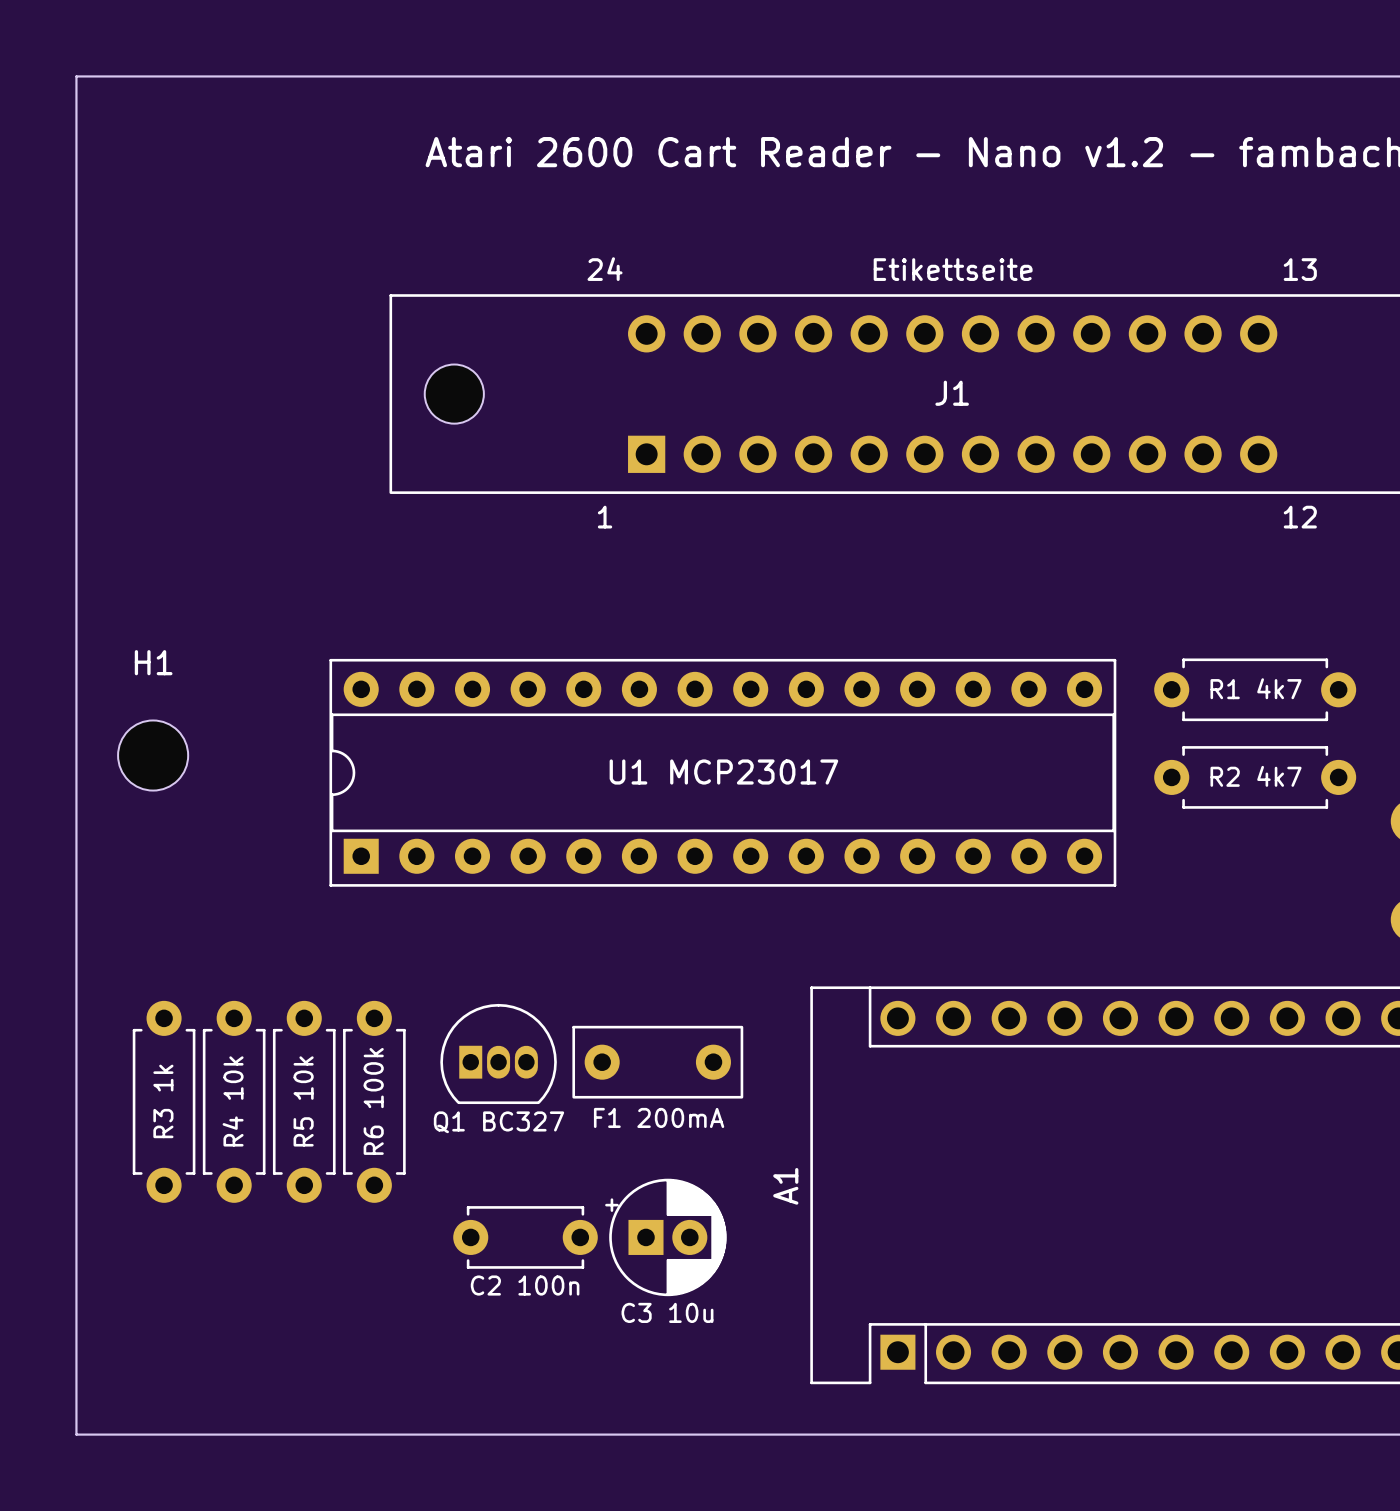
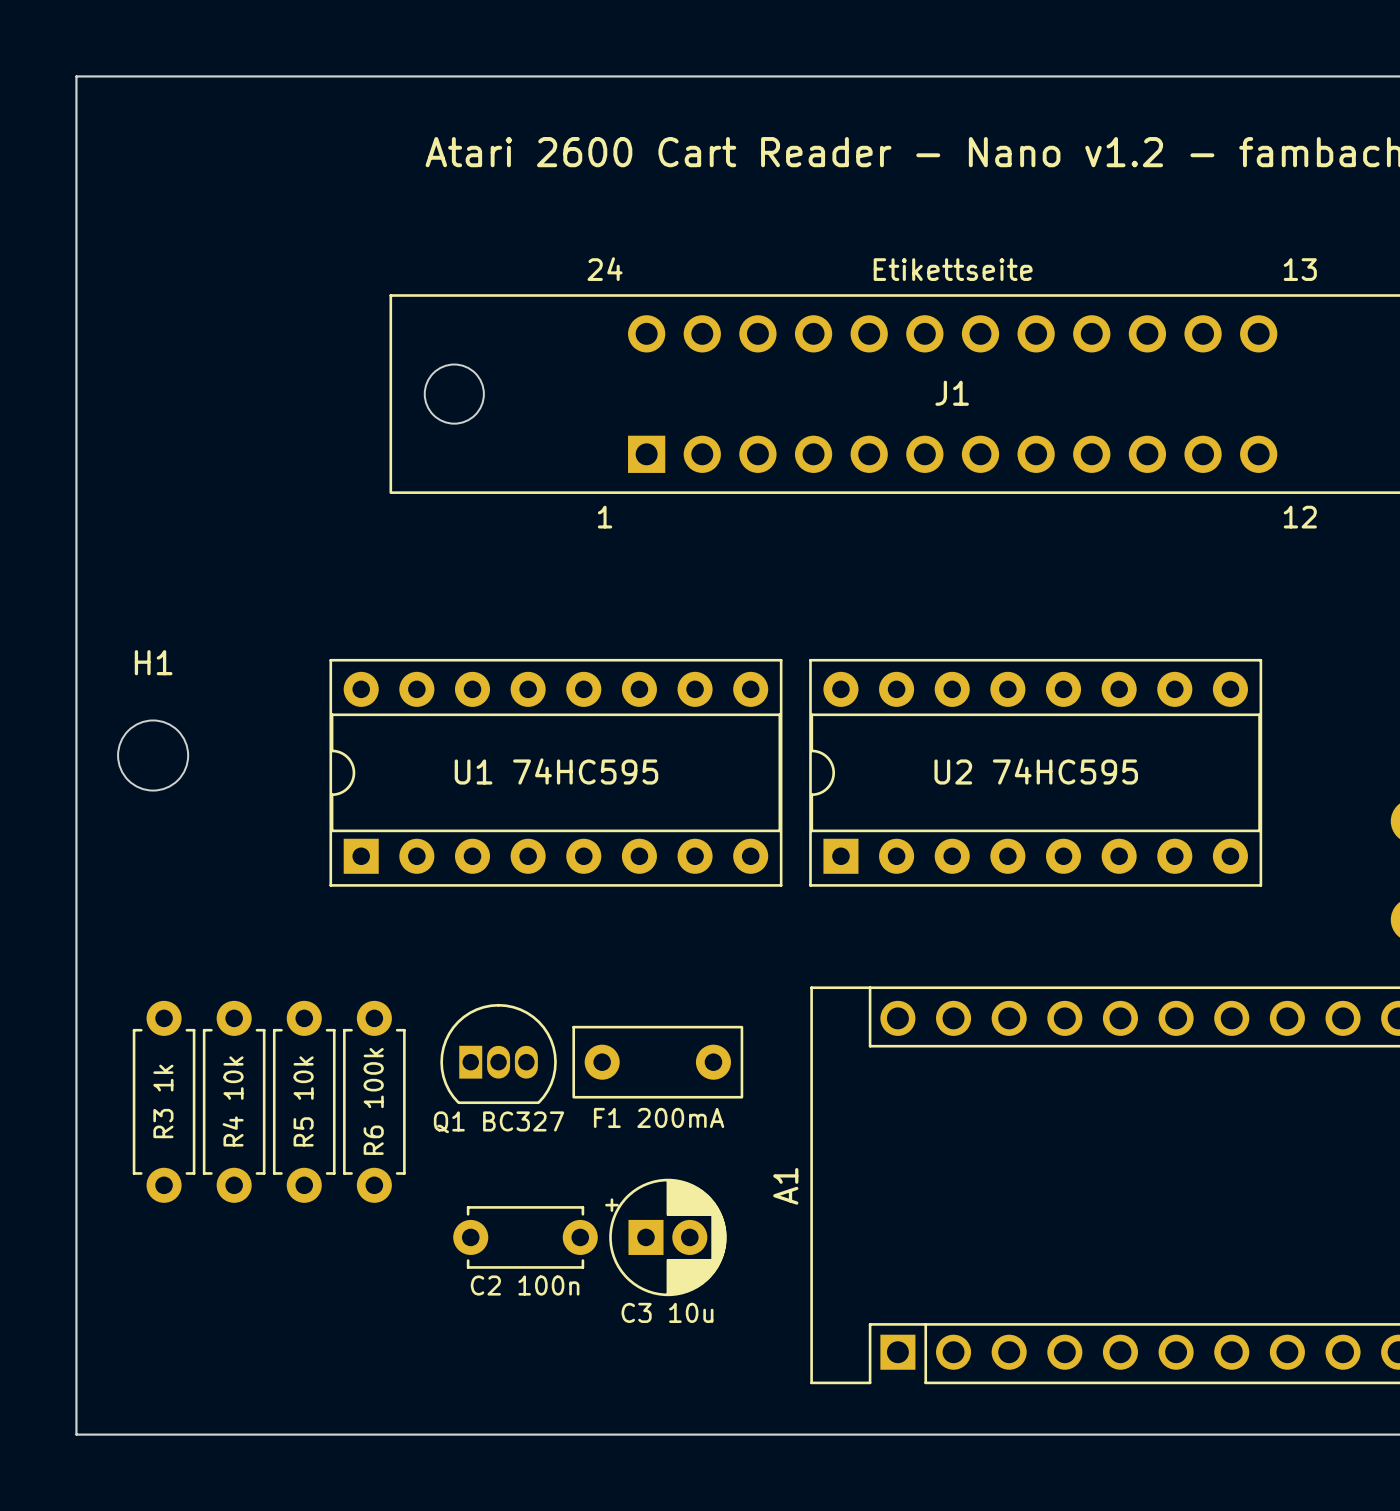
text: R1 4k7 (1256, 688) -> none
part: (1255, 689) -> none
text: none -> U1 74HC595 (556, 771)
text: none -> U2 74HC595 (1036, 771)
part: none -> (555, 772)
part: (722, 772) -> none
text: U1 MCP23017 (723, 772) -> none
part: none -> (1035, 772)
text: R2 4k7 (1256, 776) -> none
part: (1255, 777) -> none

